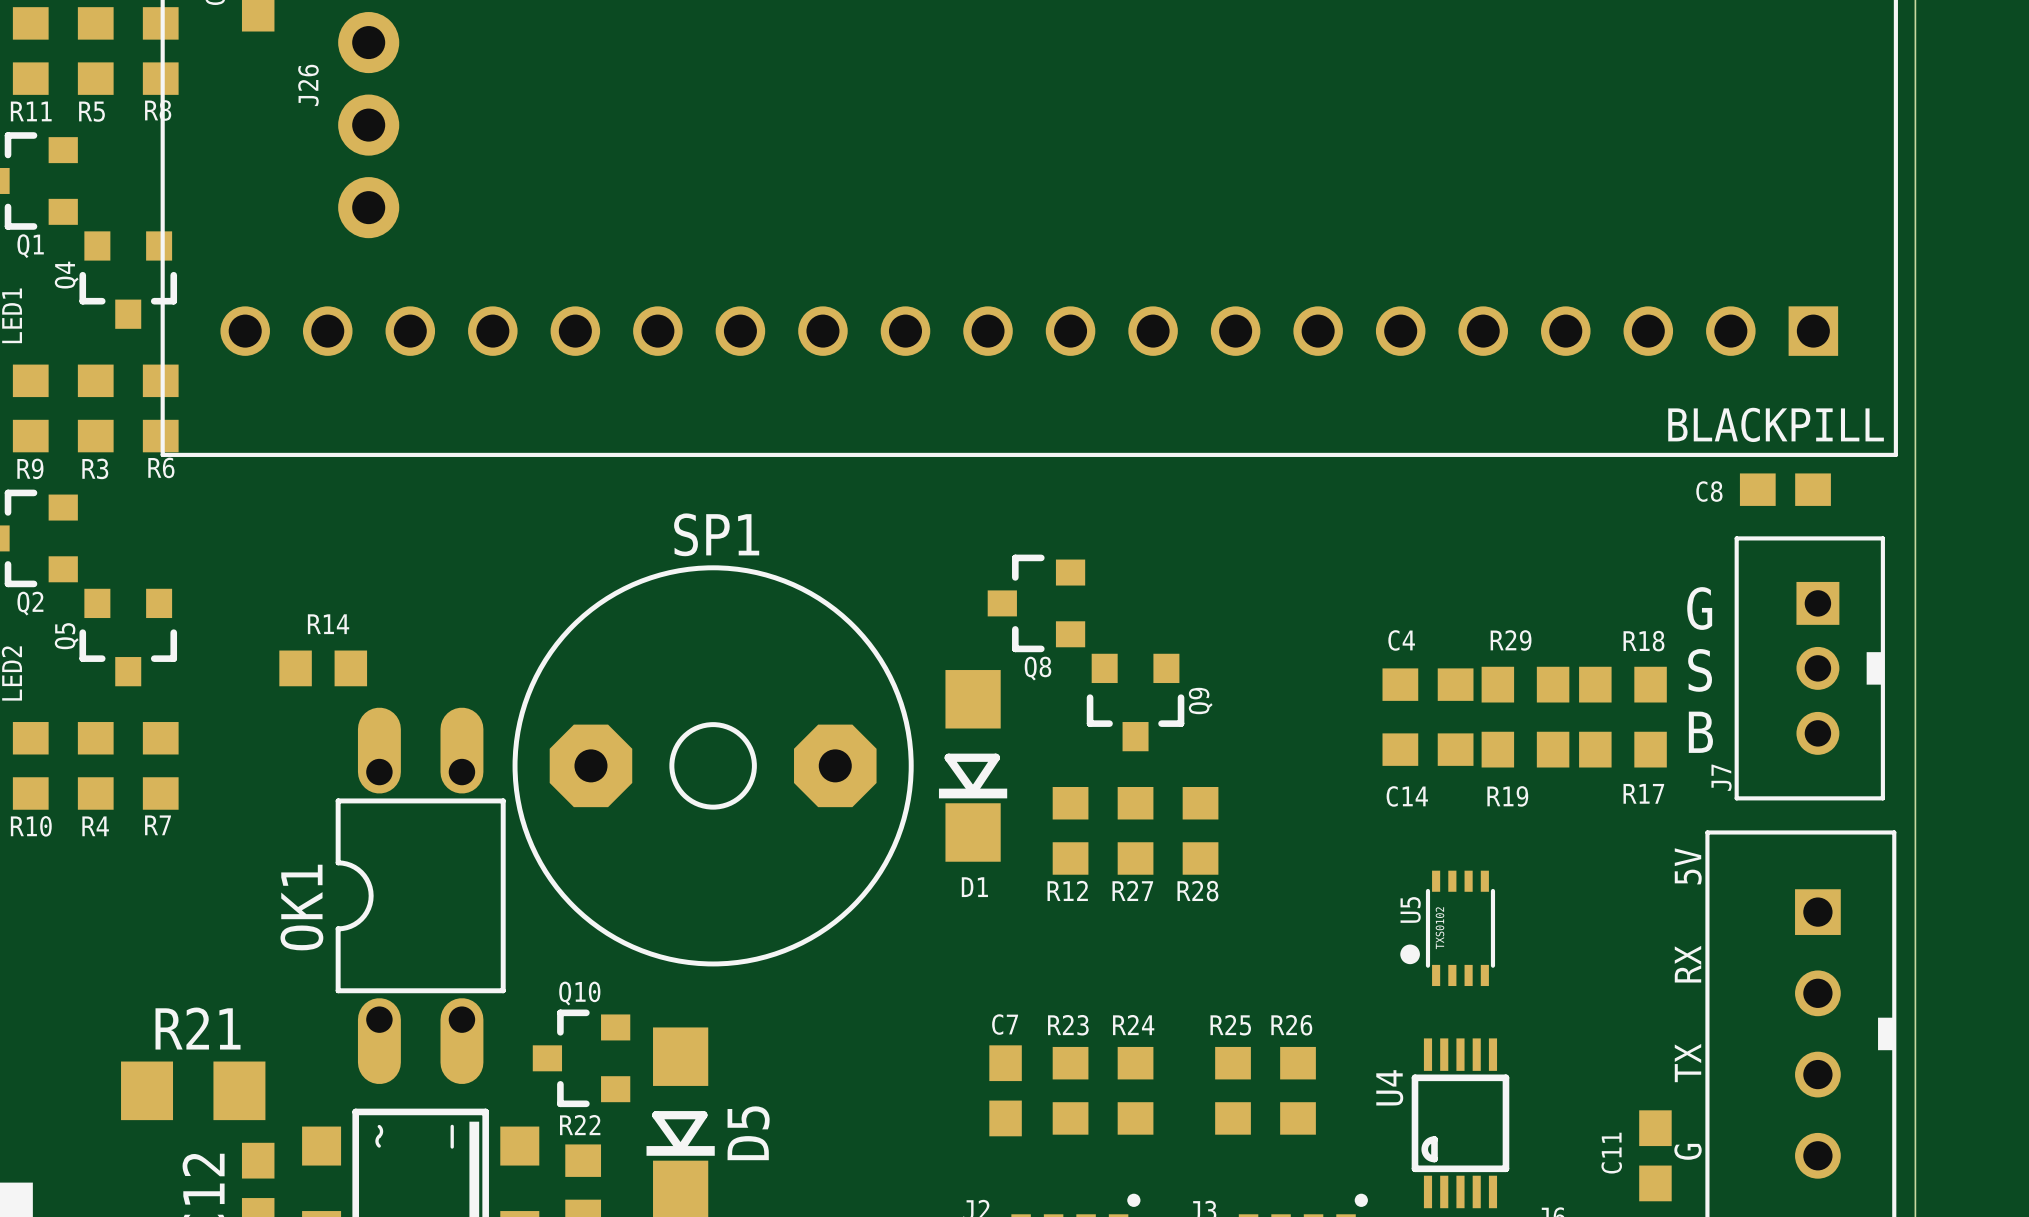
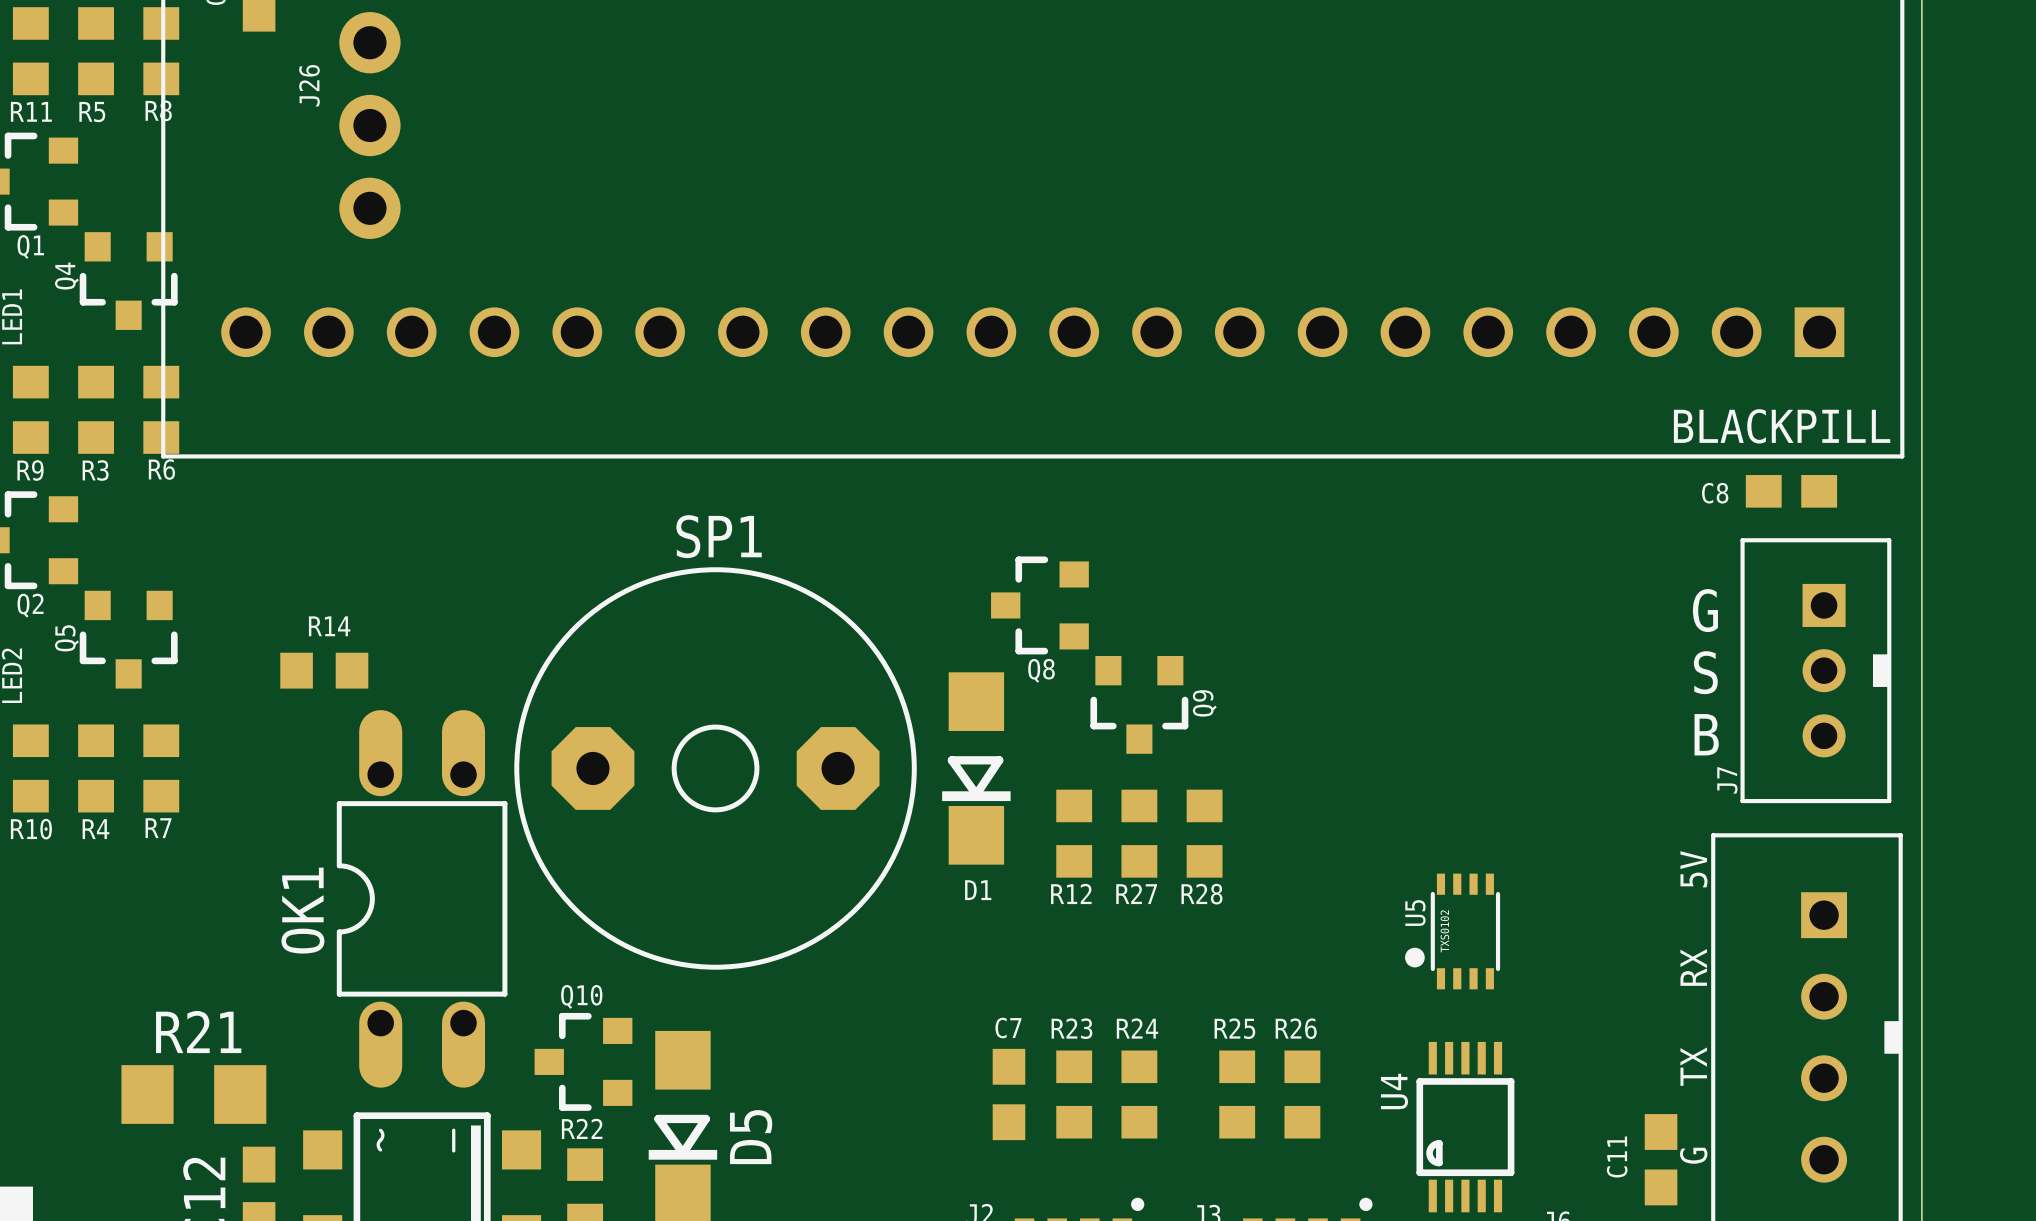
C4: (1427, 684) -> none
R29: (1525, 684) -> none
R18: (1622, 684) -> none
C14: (1427, 749) -> none
R19: (1525, 749) -> none
R17: (1622, 749) -> none

